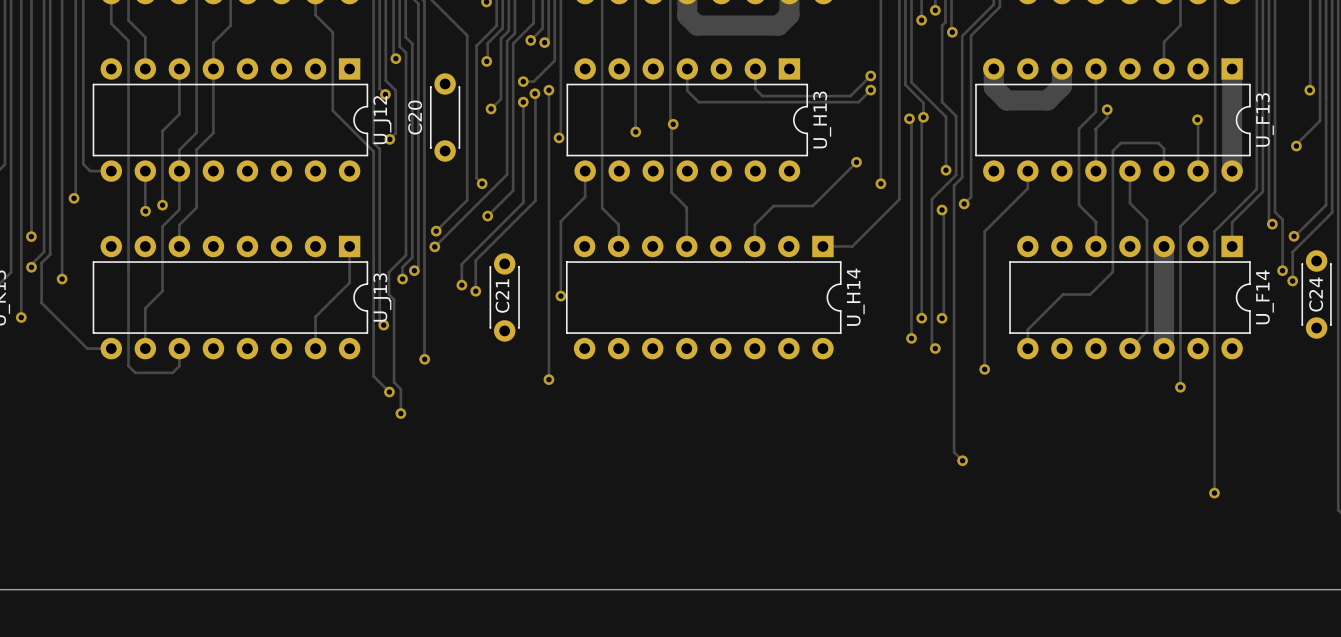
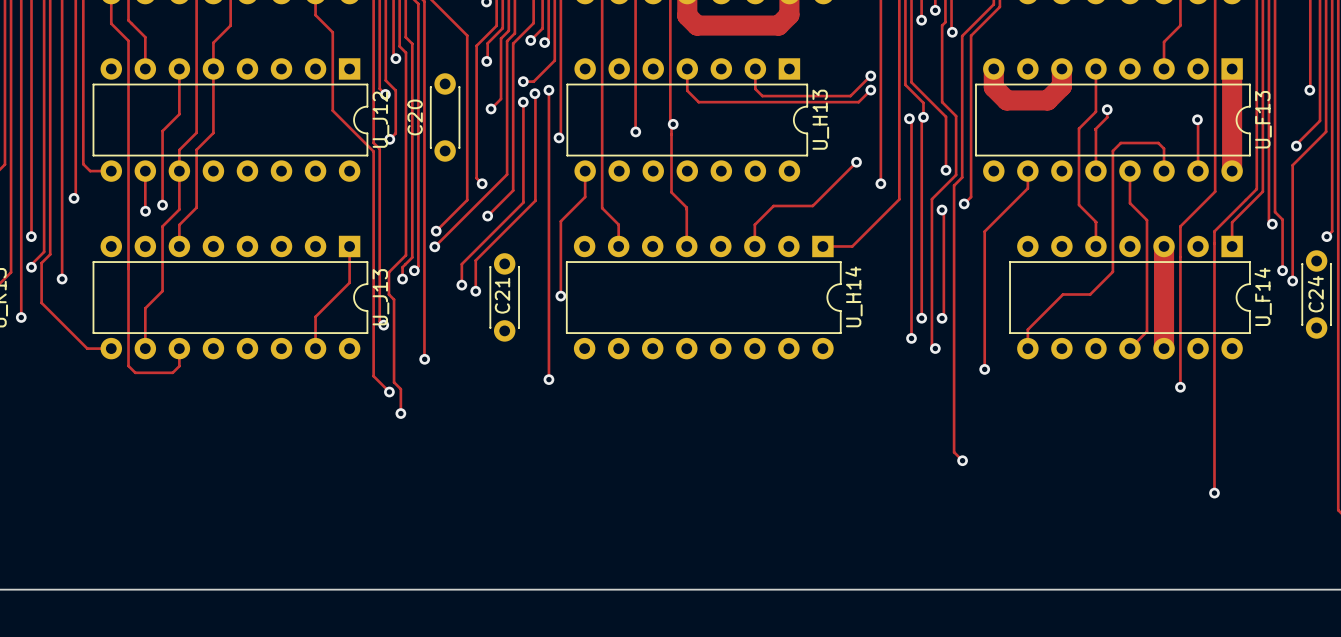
track: (1326, 131) (1326, 205) (1294, 236) -> (1326, 131) (1292, 165) (1292, 252)
track: (1332, 212) (1292, 252) -> (1332, 212) (1332, 231) (1326, 236)
via position: (1294, 236) -> (1326, 236)

